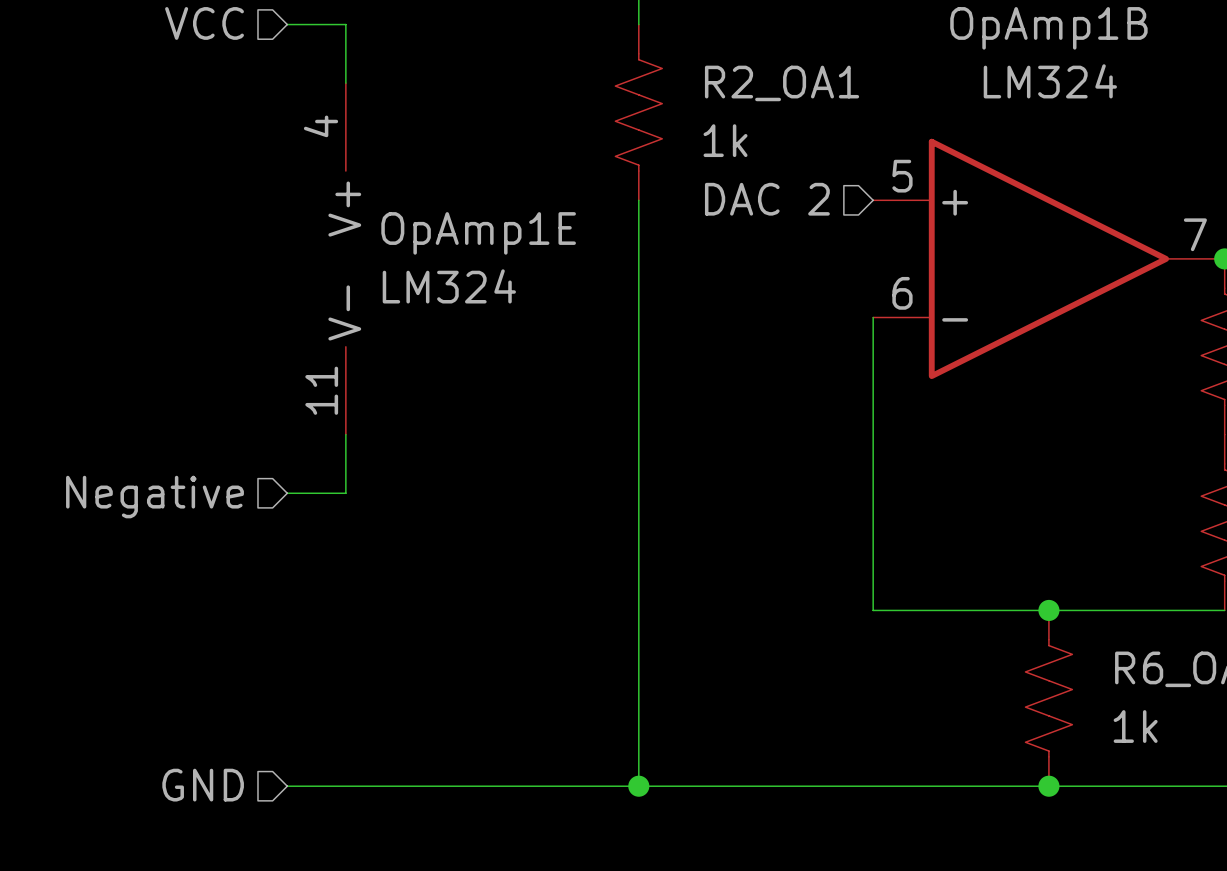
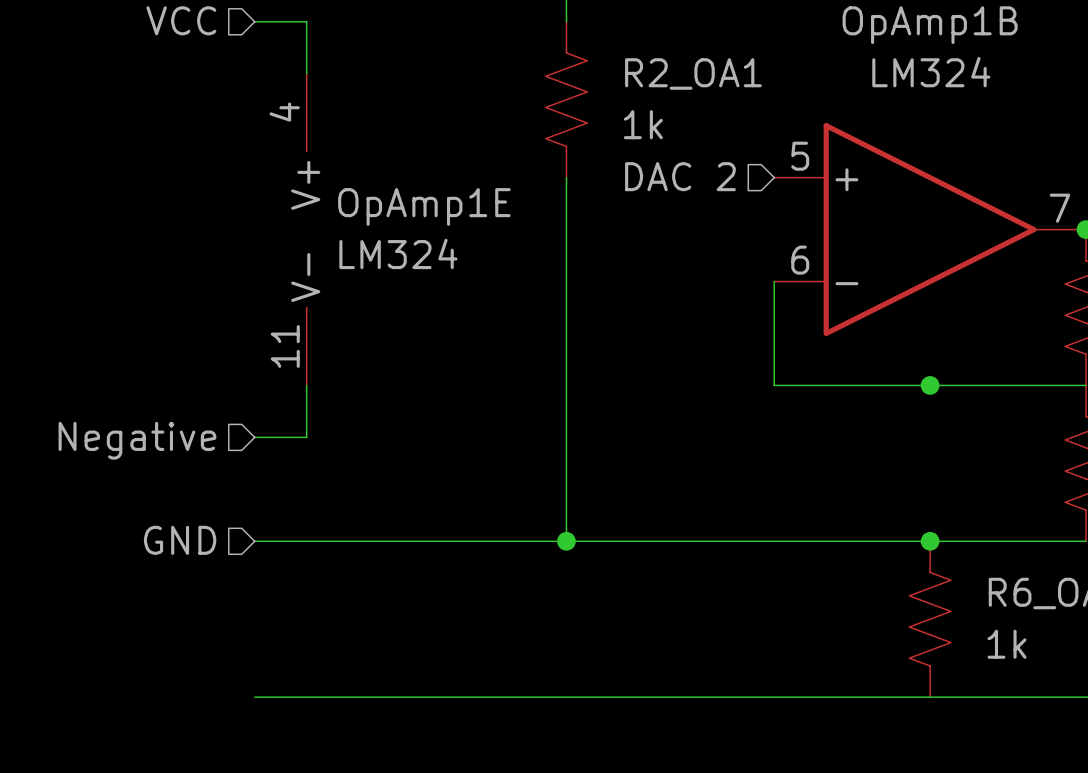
wire: (873, 434) (873, 610) -> (774, 385) (1085, 385)
junction: none -> (930, 385)
wire: none -> (254, 541) (774, 541)
wire: (638, 610) (638, 786) -> none
junction: none -> (566, 541)
hierarchical label position: GND (203, 785) -> GND (180, 540)
junction: (638, 786) -> none
junction: (1048, 786) -> none

